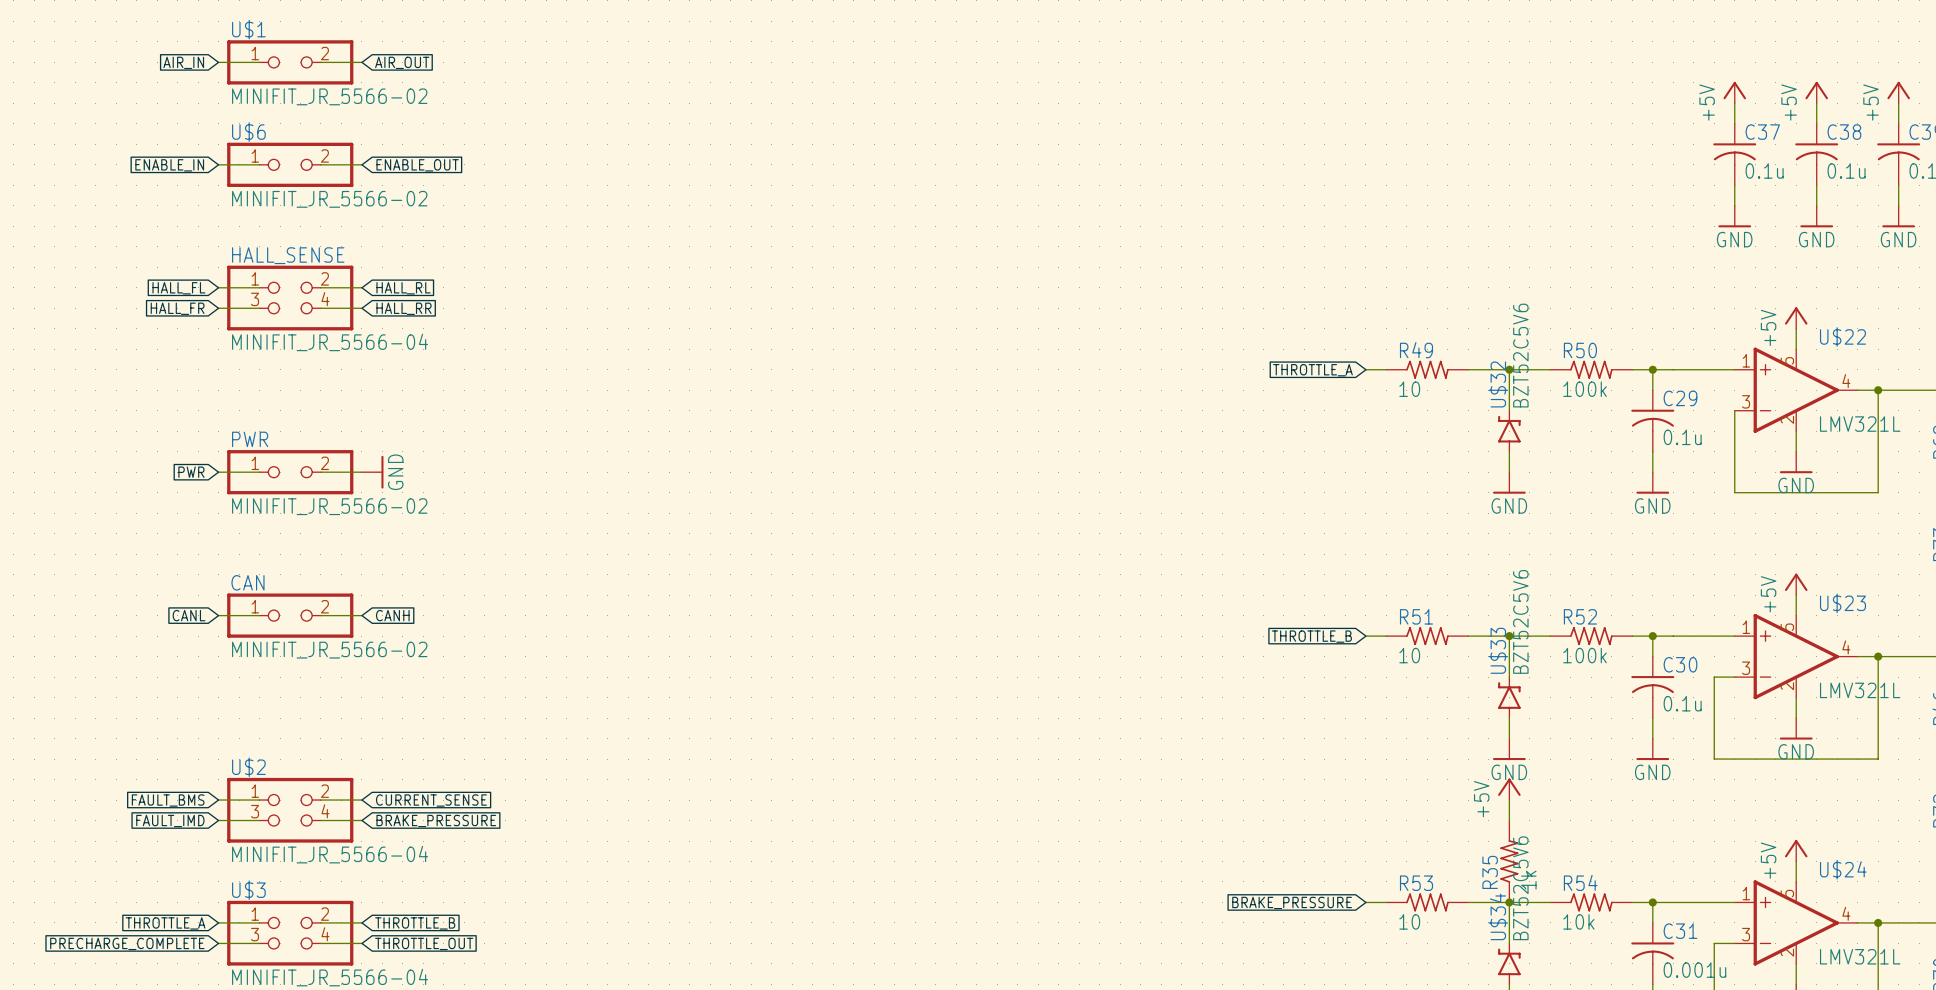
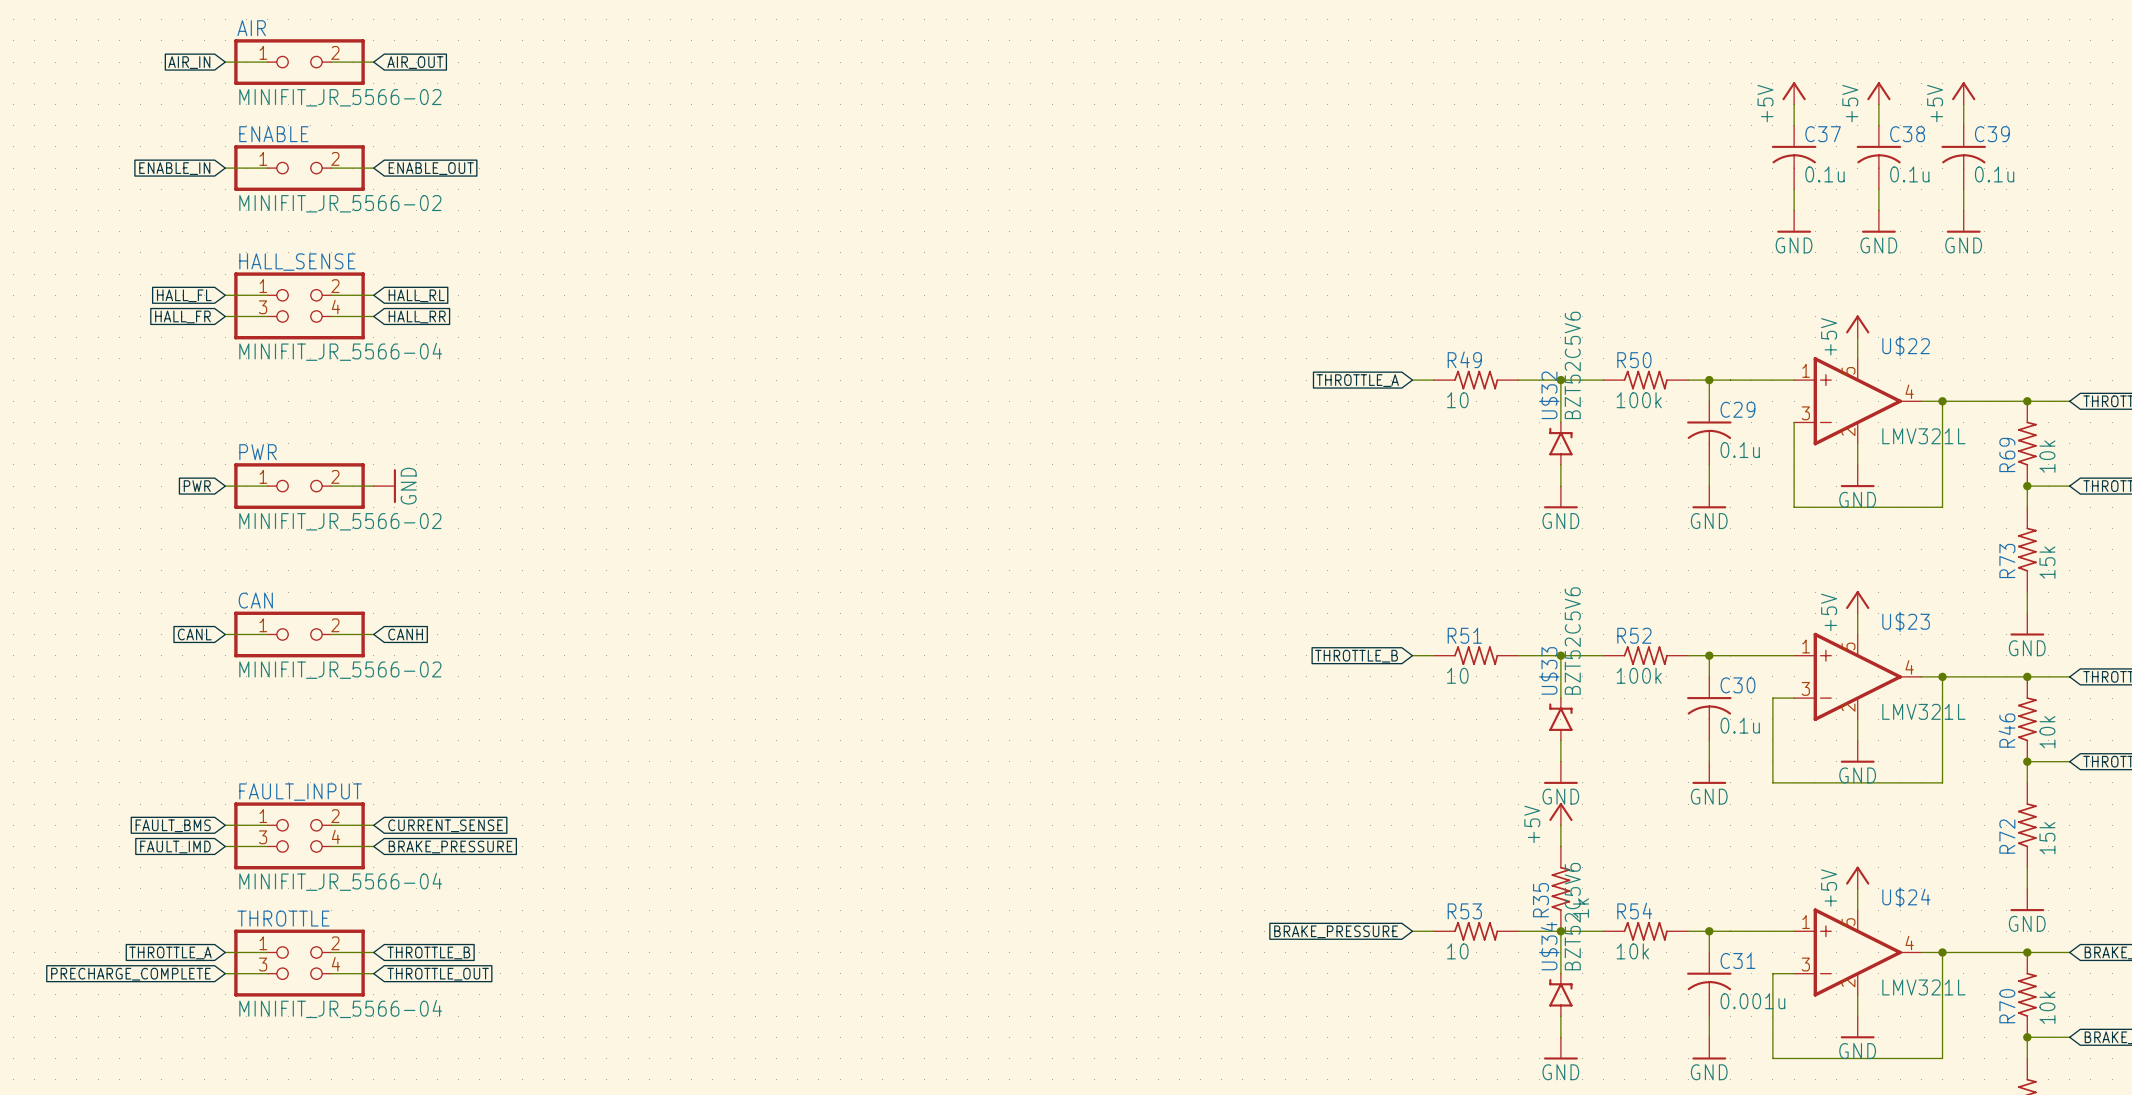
U$1 name: U$1 (248, 29) -> AIR (251, 28)
U$6 name: U$6 (248, 132) -> ENABLE (273, 134)
U$2 name: U$2 (248, 767) -> FAULT_INPUT (300, 792)
U$3 name: U$3 (248, 890) -> THROTTLE (283, 918)

